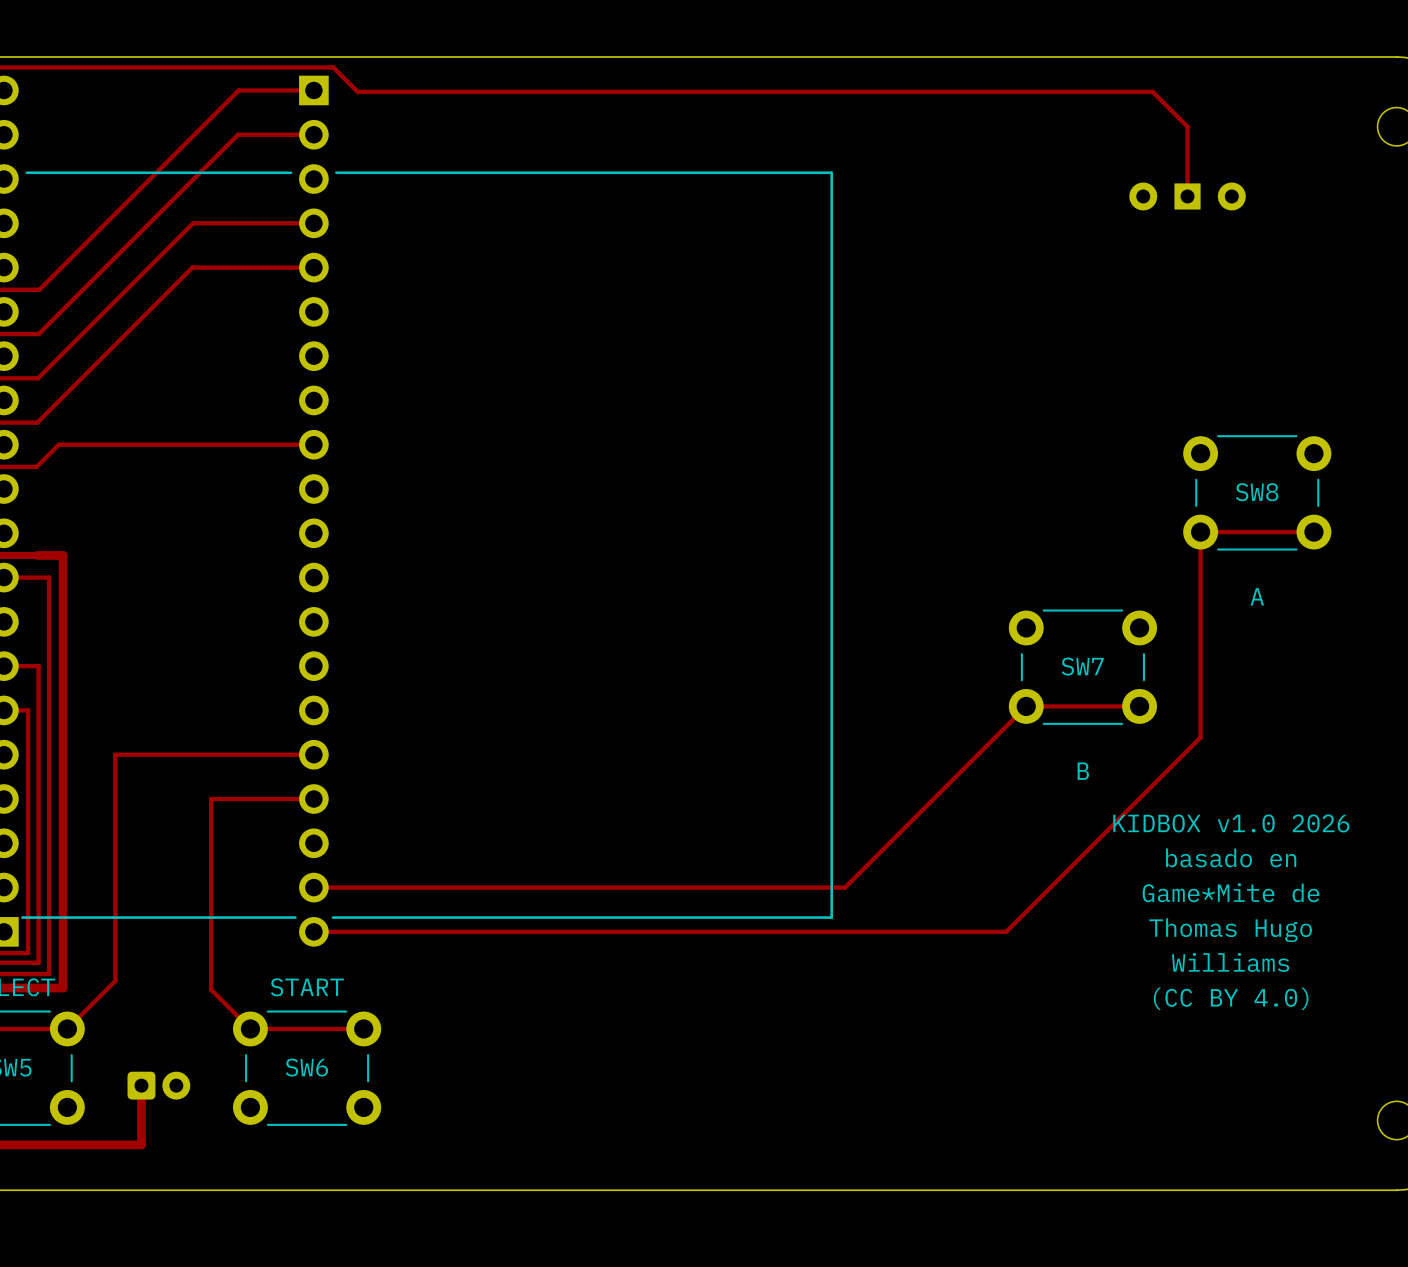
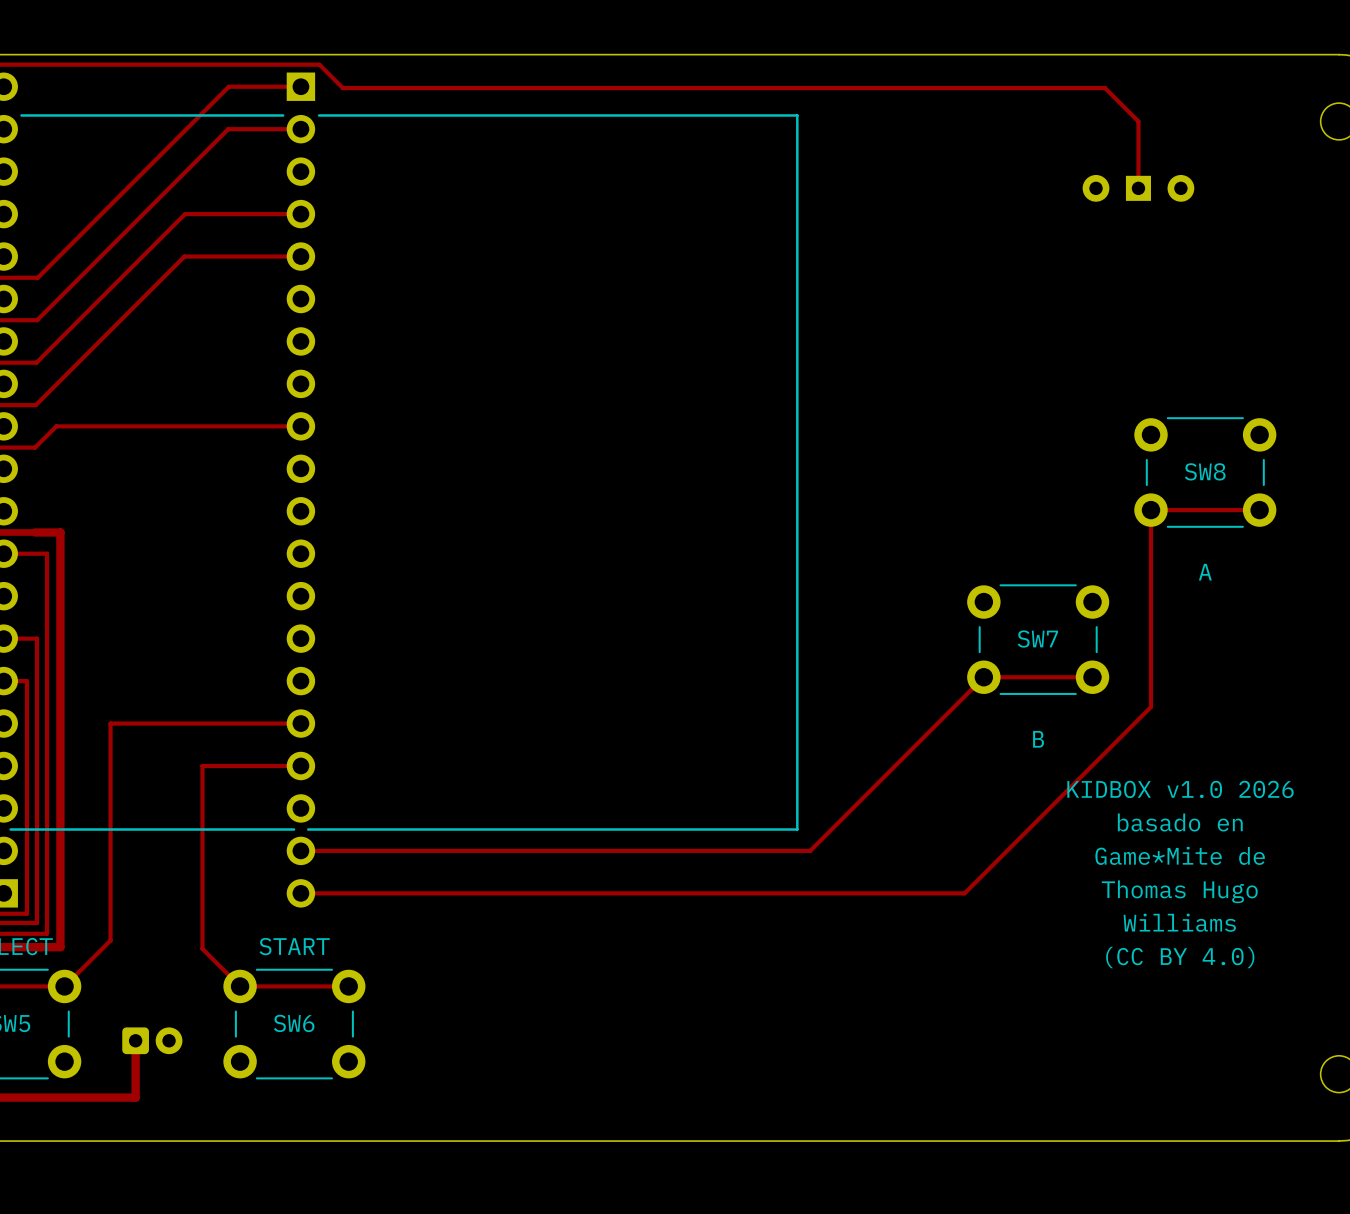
line: none -> (21, 115) (283, 115)
line: (26, 172) (291, 172) -> none
line: (336, 172) (831, 172) -> (319, 115) (797, 115) (797, 165)
line: none -> (10, 829) (294, 829)
line: (831, 865) (831, 917) (332, 917) -> (797, 829) (308, 829)
line: (22, 917) (295, 917) -> none

